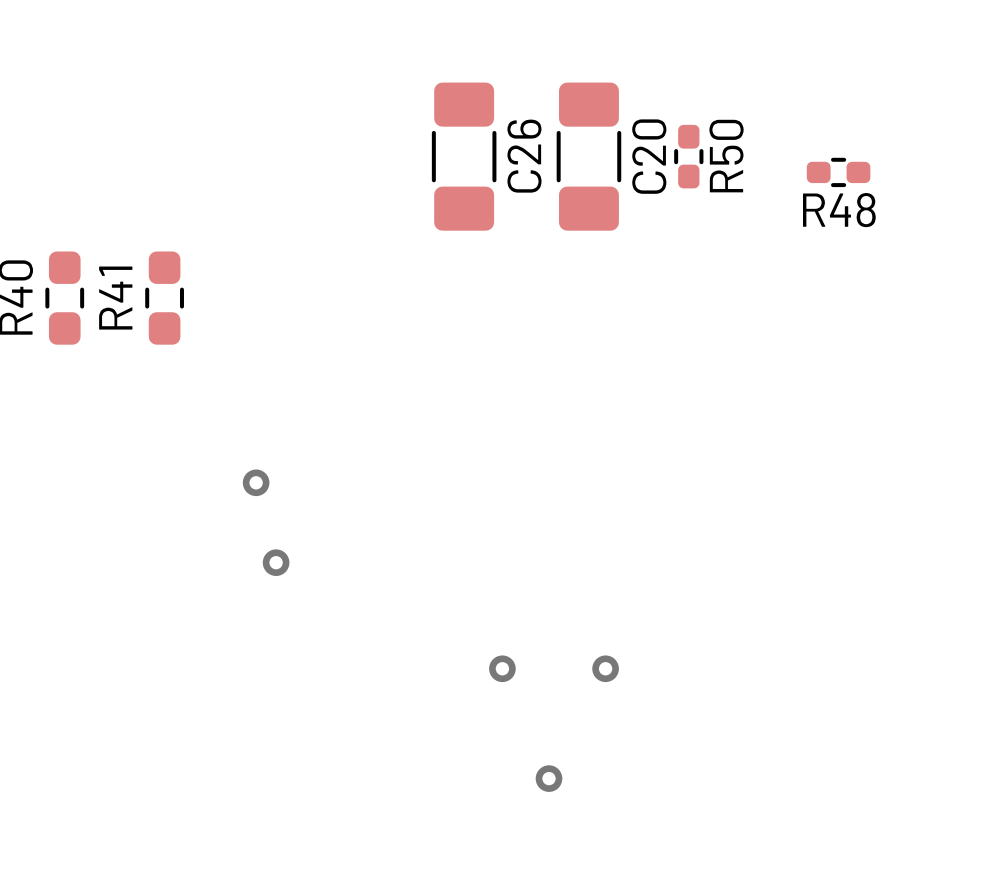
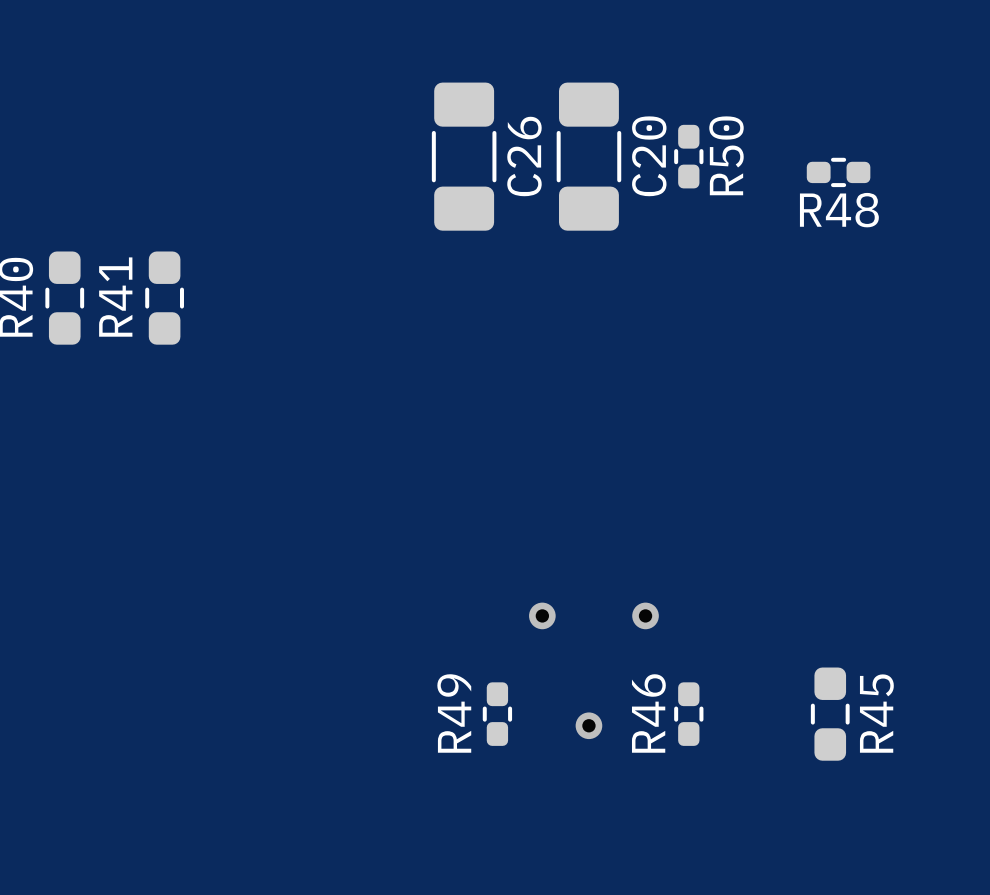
via: (256, 482) -> none
via: (276, 562) -> none
via: none -> (542, 615)
via: none -> (645, 615)
via: (502, 668) -> none
via: (605, 668) -> none
R49: none -> (497, 714)
R46: none -> (688, 714)
R45: none -> (830, 714)
via: none -> (588, 725)
via: (549, 778) -> none

